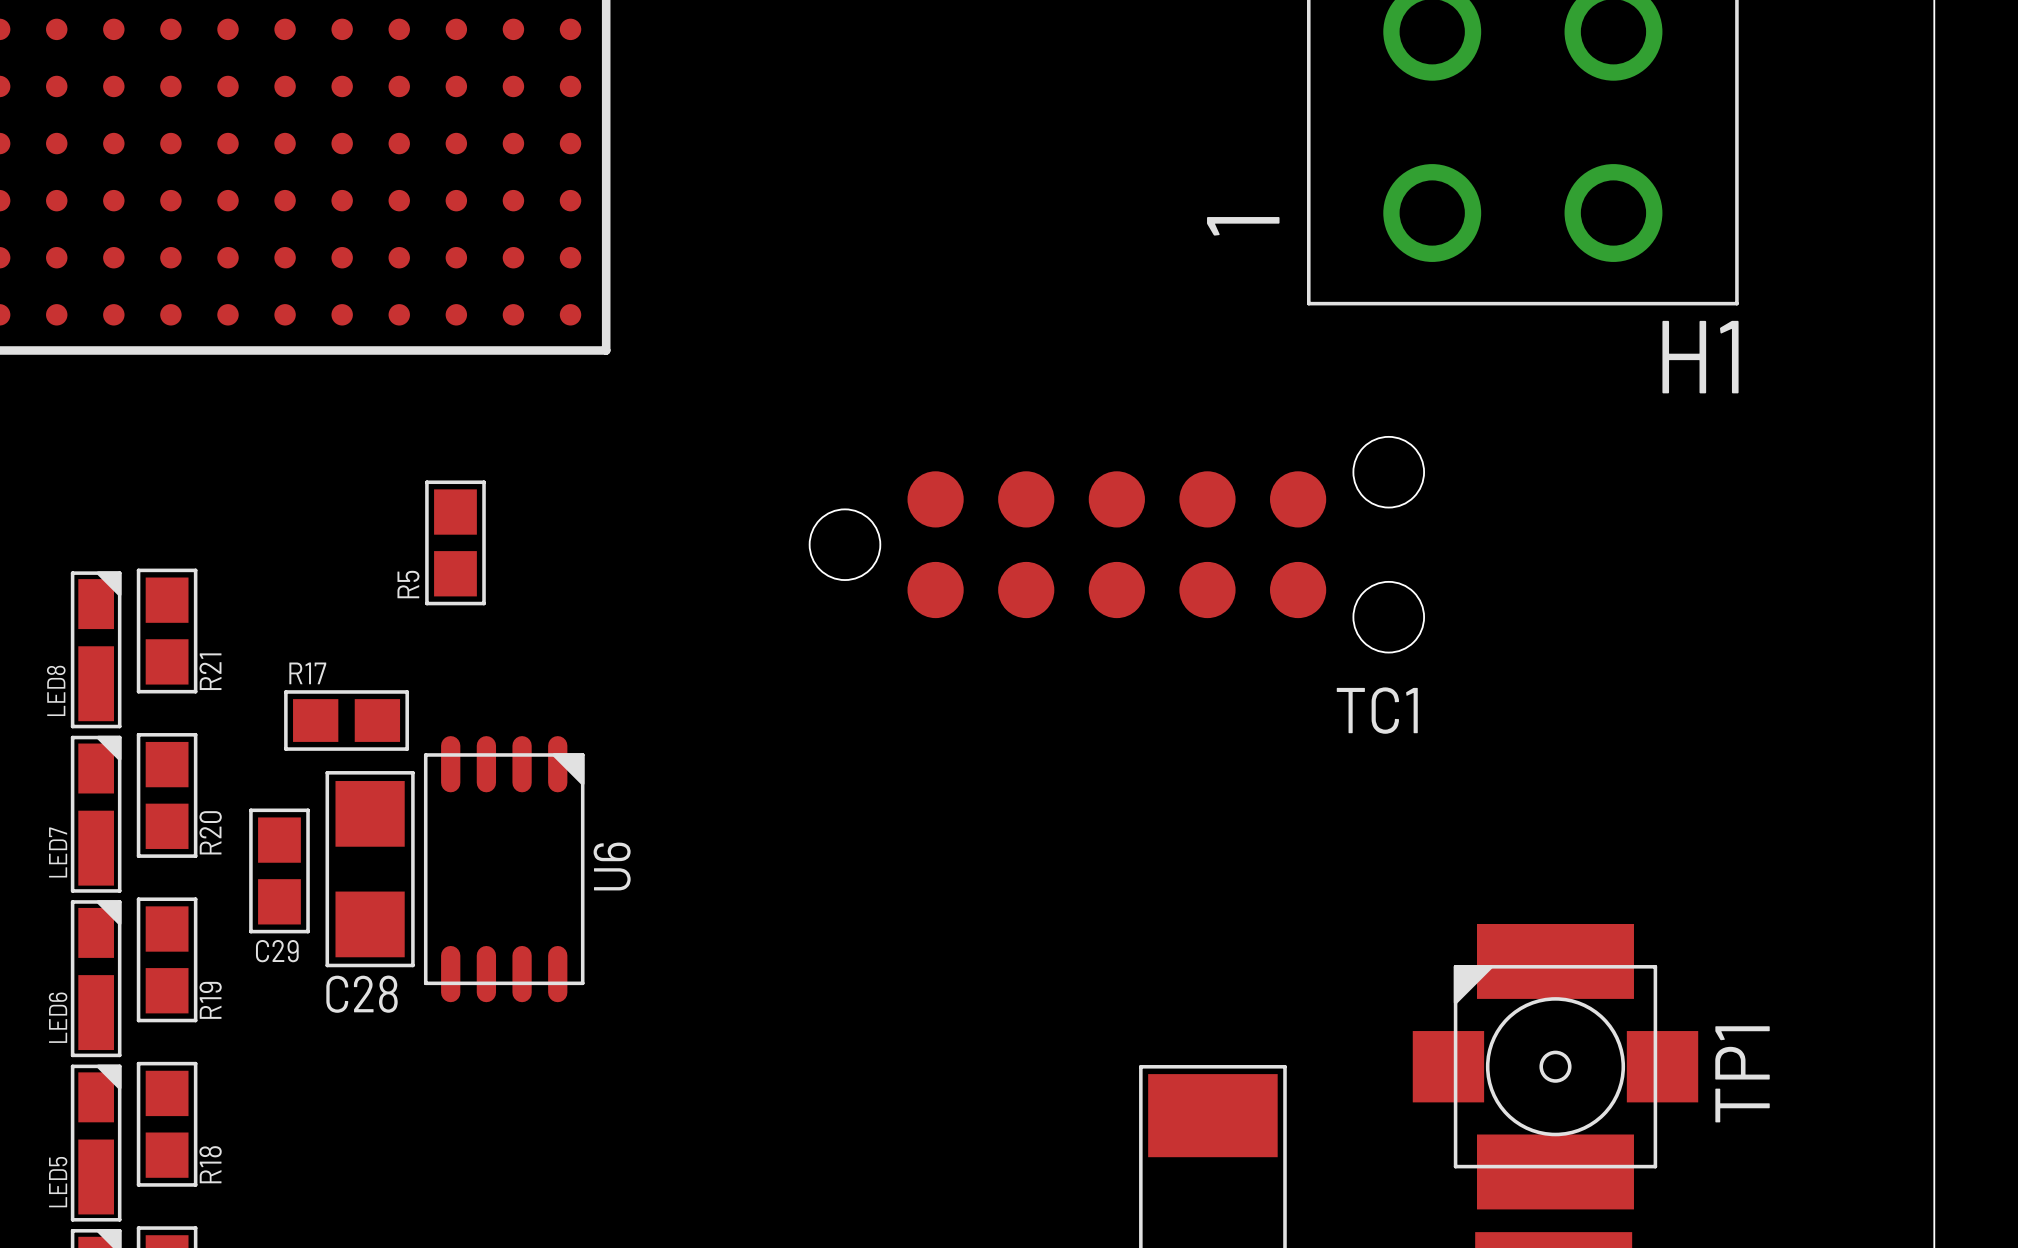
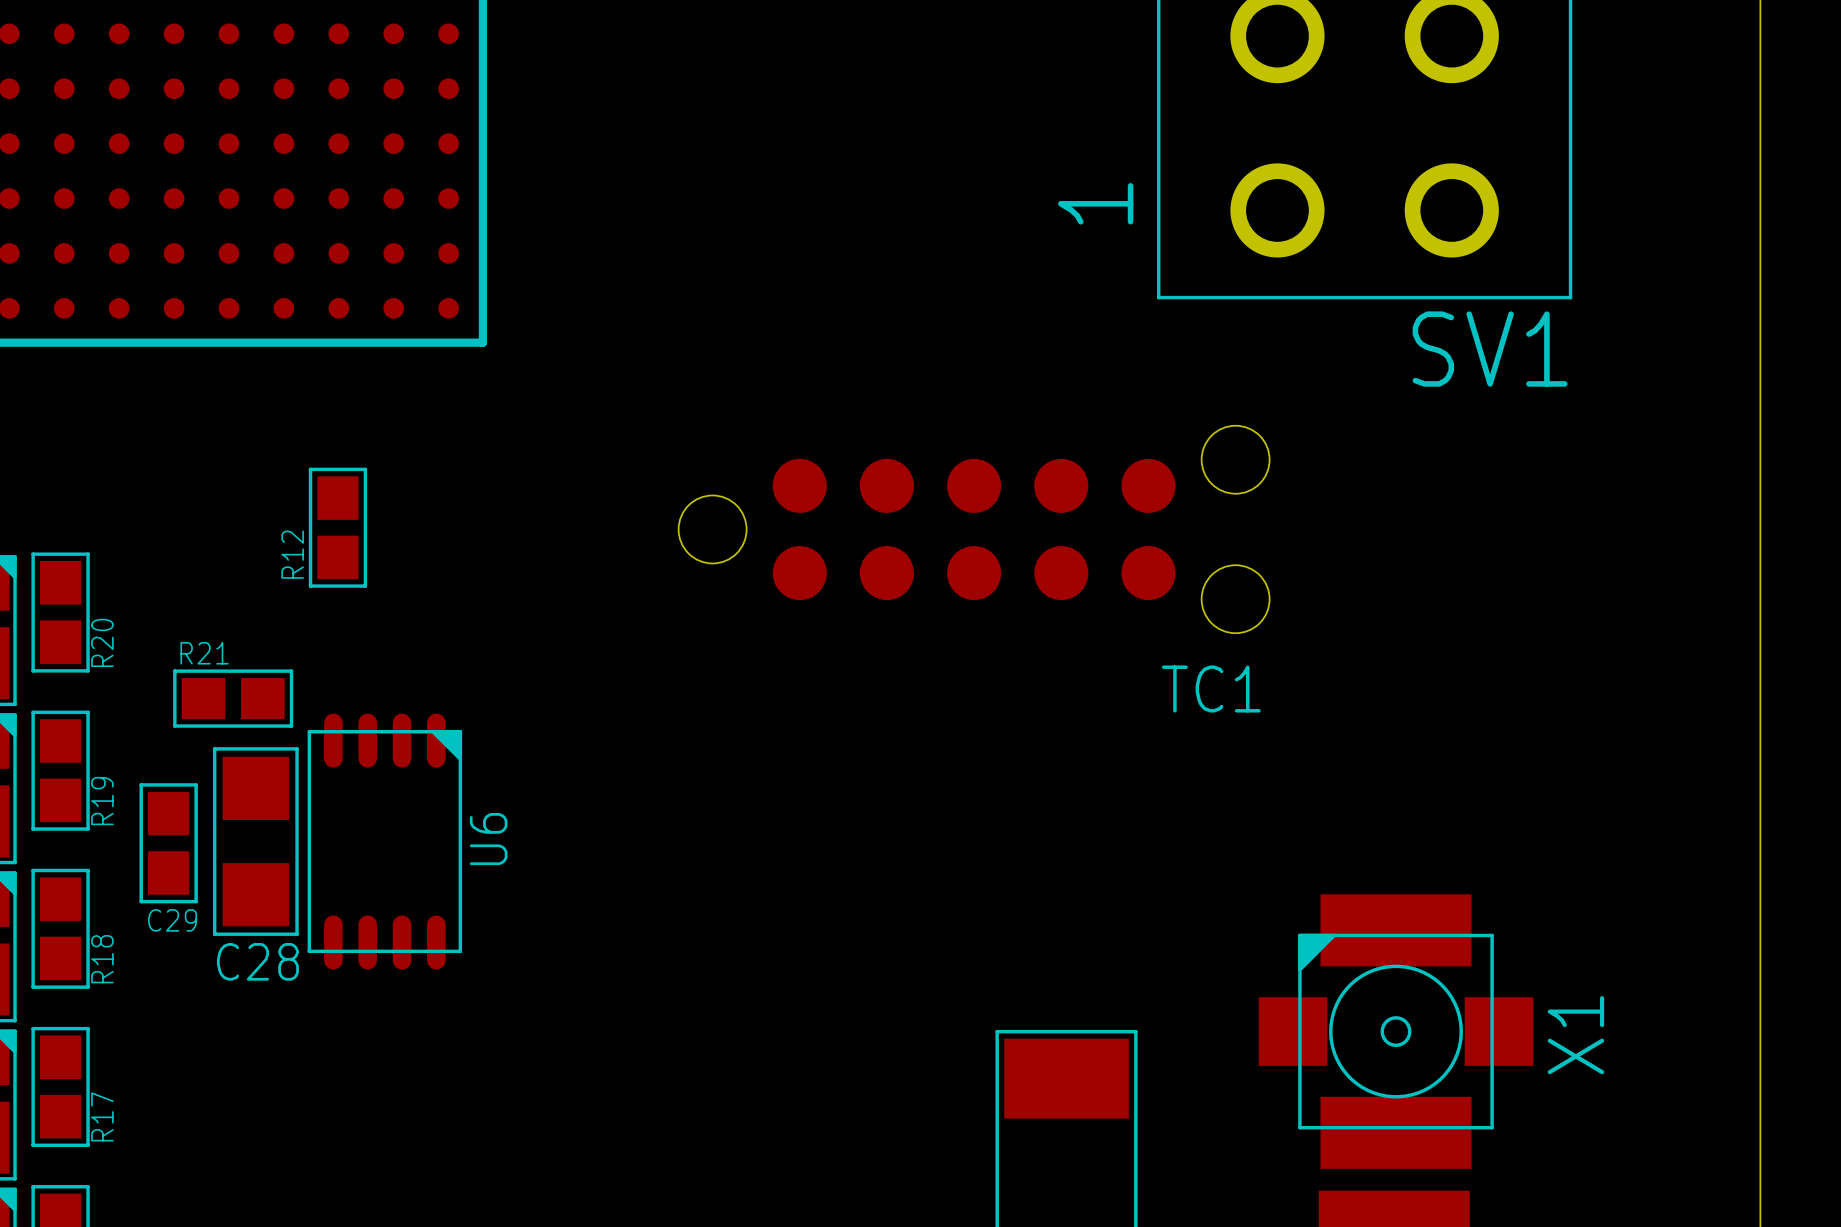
H1 name: H1 (1700, 357) -> SV1 (1490, 349)
R5 name: R5 (408, 584) -> R12 (292, 554)
R21 name: R21 (210, 671) -> R20 (102, 642)
R17 name: R17 (307, 673) -> R21 (204, 653)
R20 name: R20 (210, 832) -> R19 (102, 801)
R19 name: R19 (210, 1000) -> R18 (102, 959)
TP1 name: TP1 (1742, 1074) -> X1 (1575, 1035)
R18 name: R18 (210, 1164) -> R17 (102, 1116)

